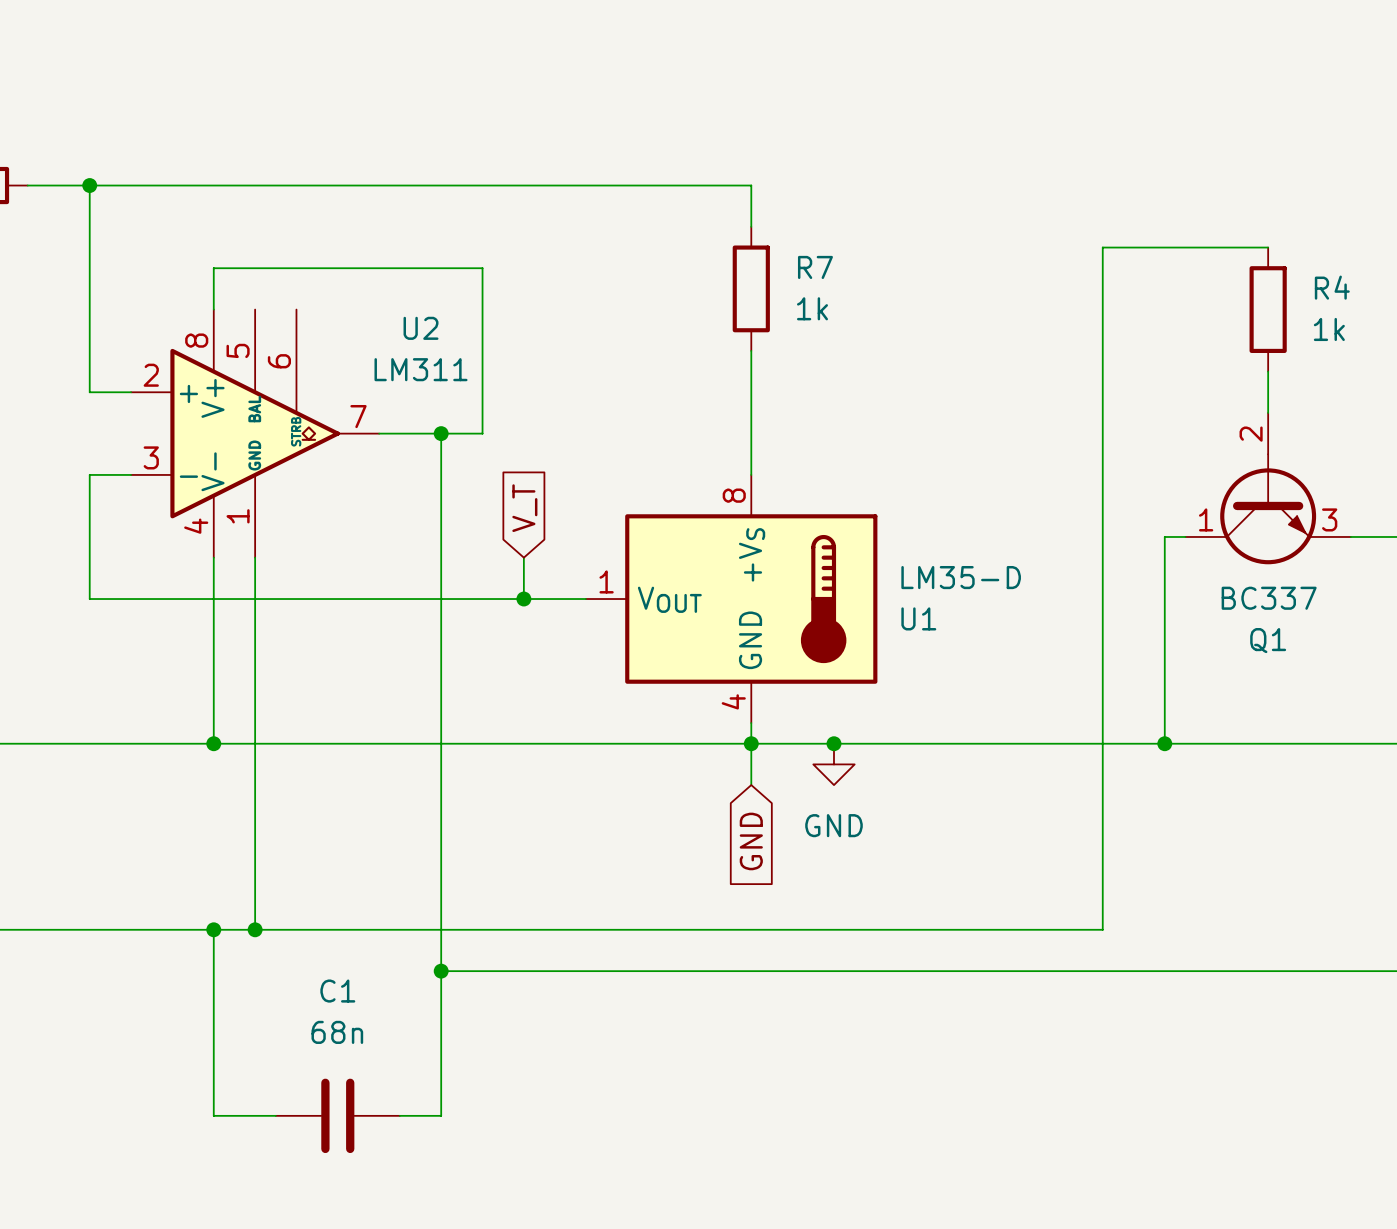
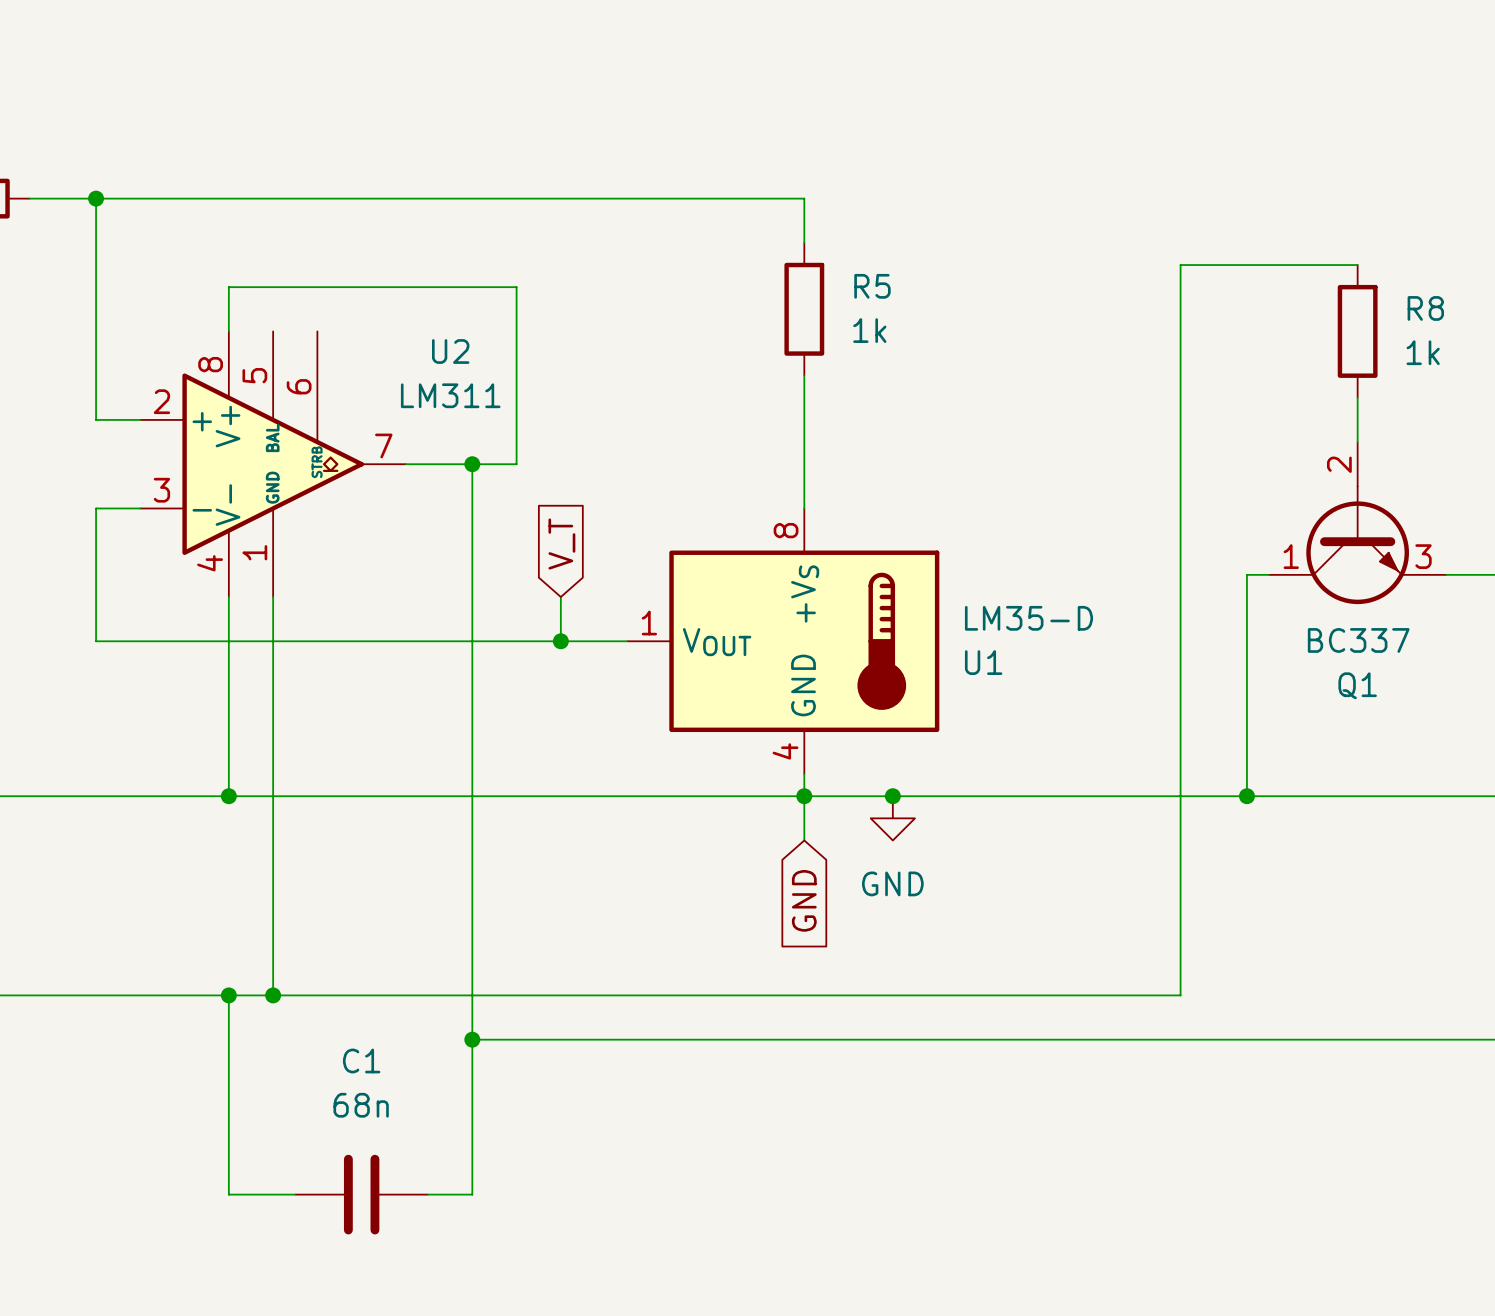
R7 name: R7 (815, 267) -> R5 (872, 286)
R4 name: R4 (1332, 287) -> R8 (1425, 308)

